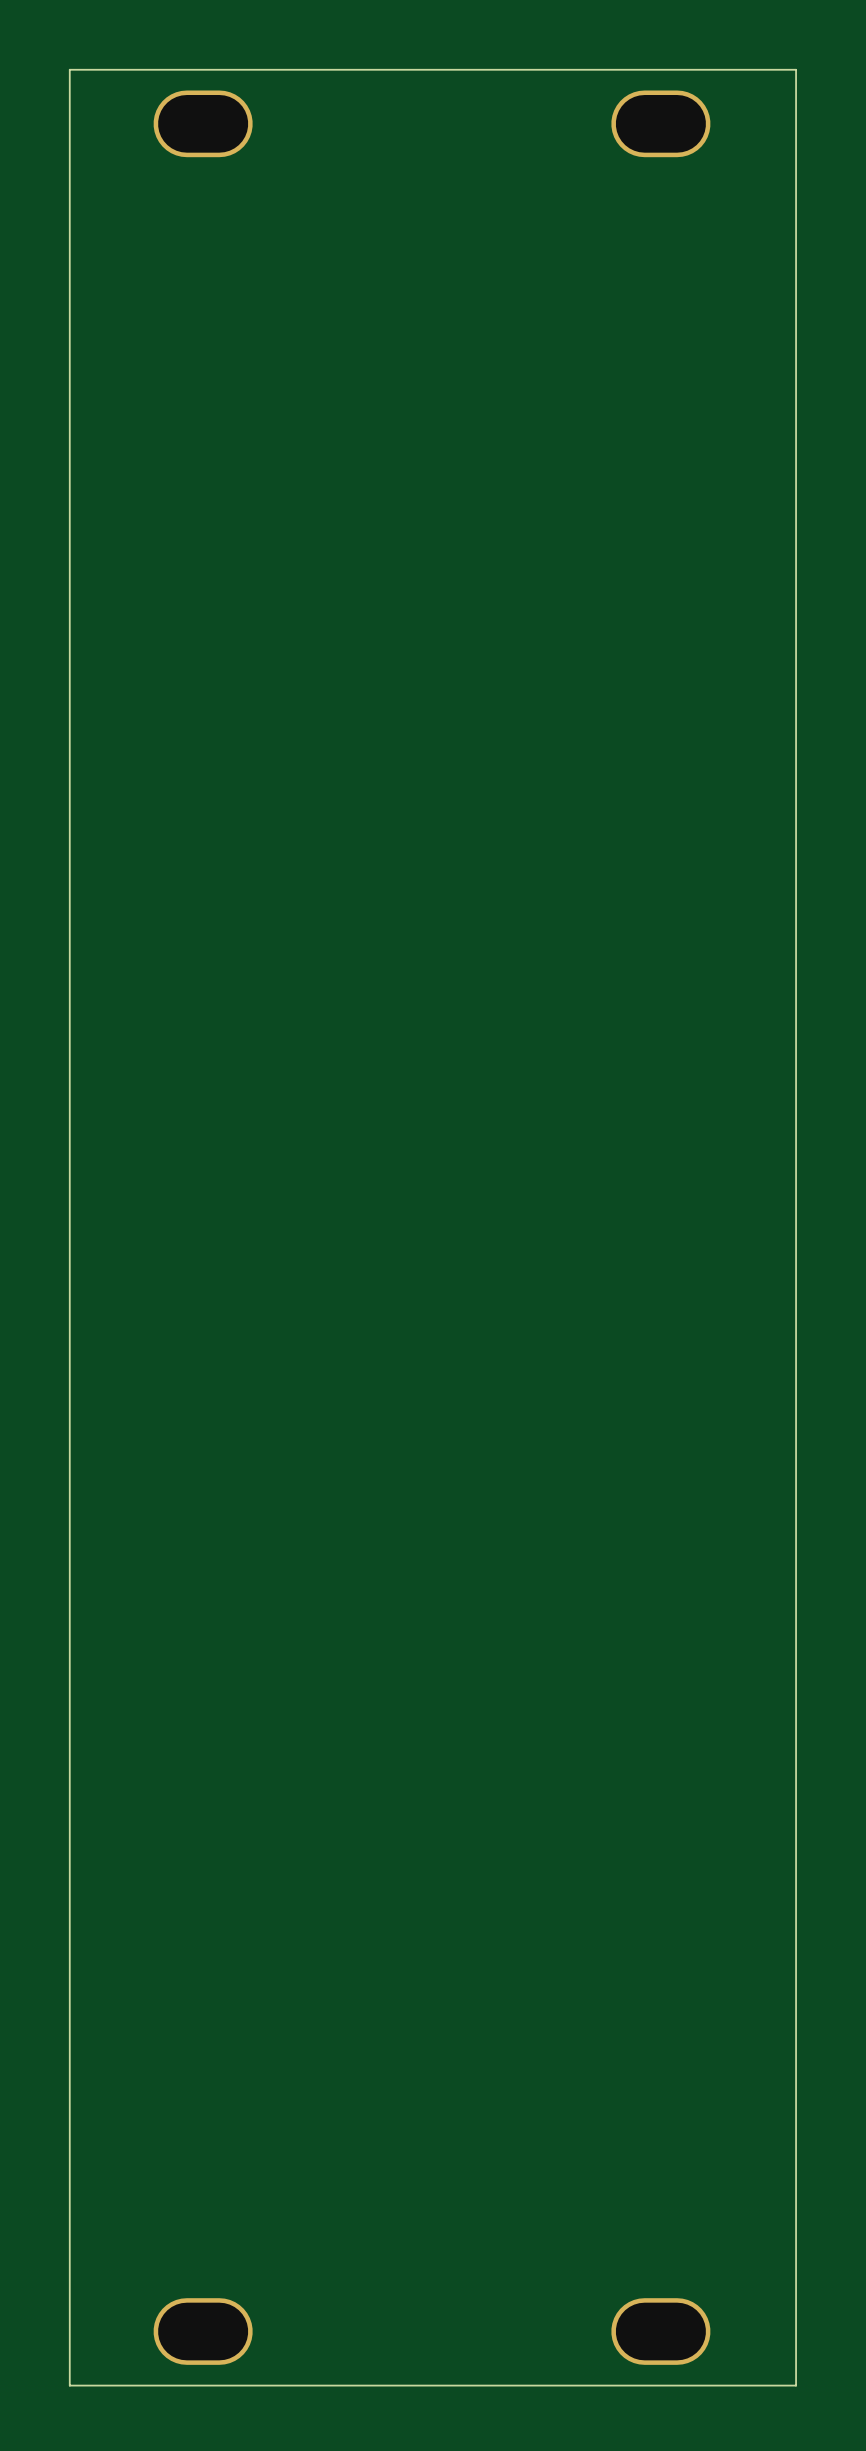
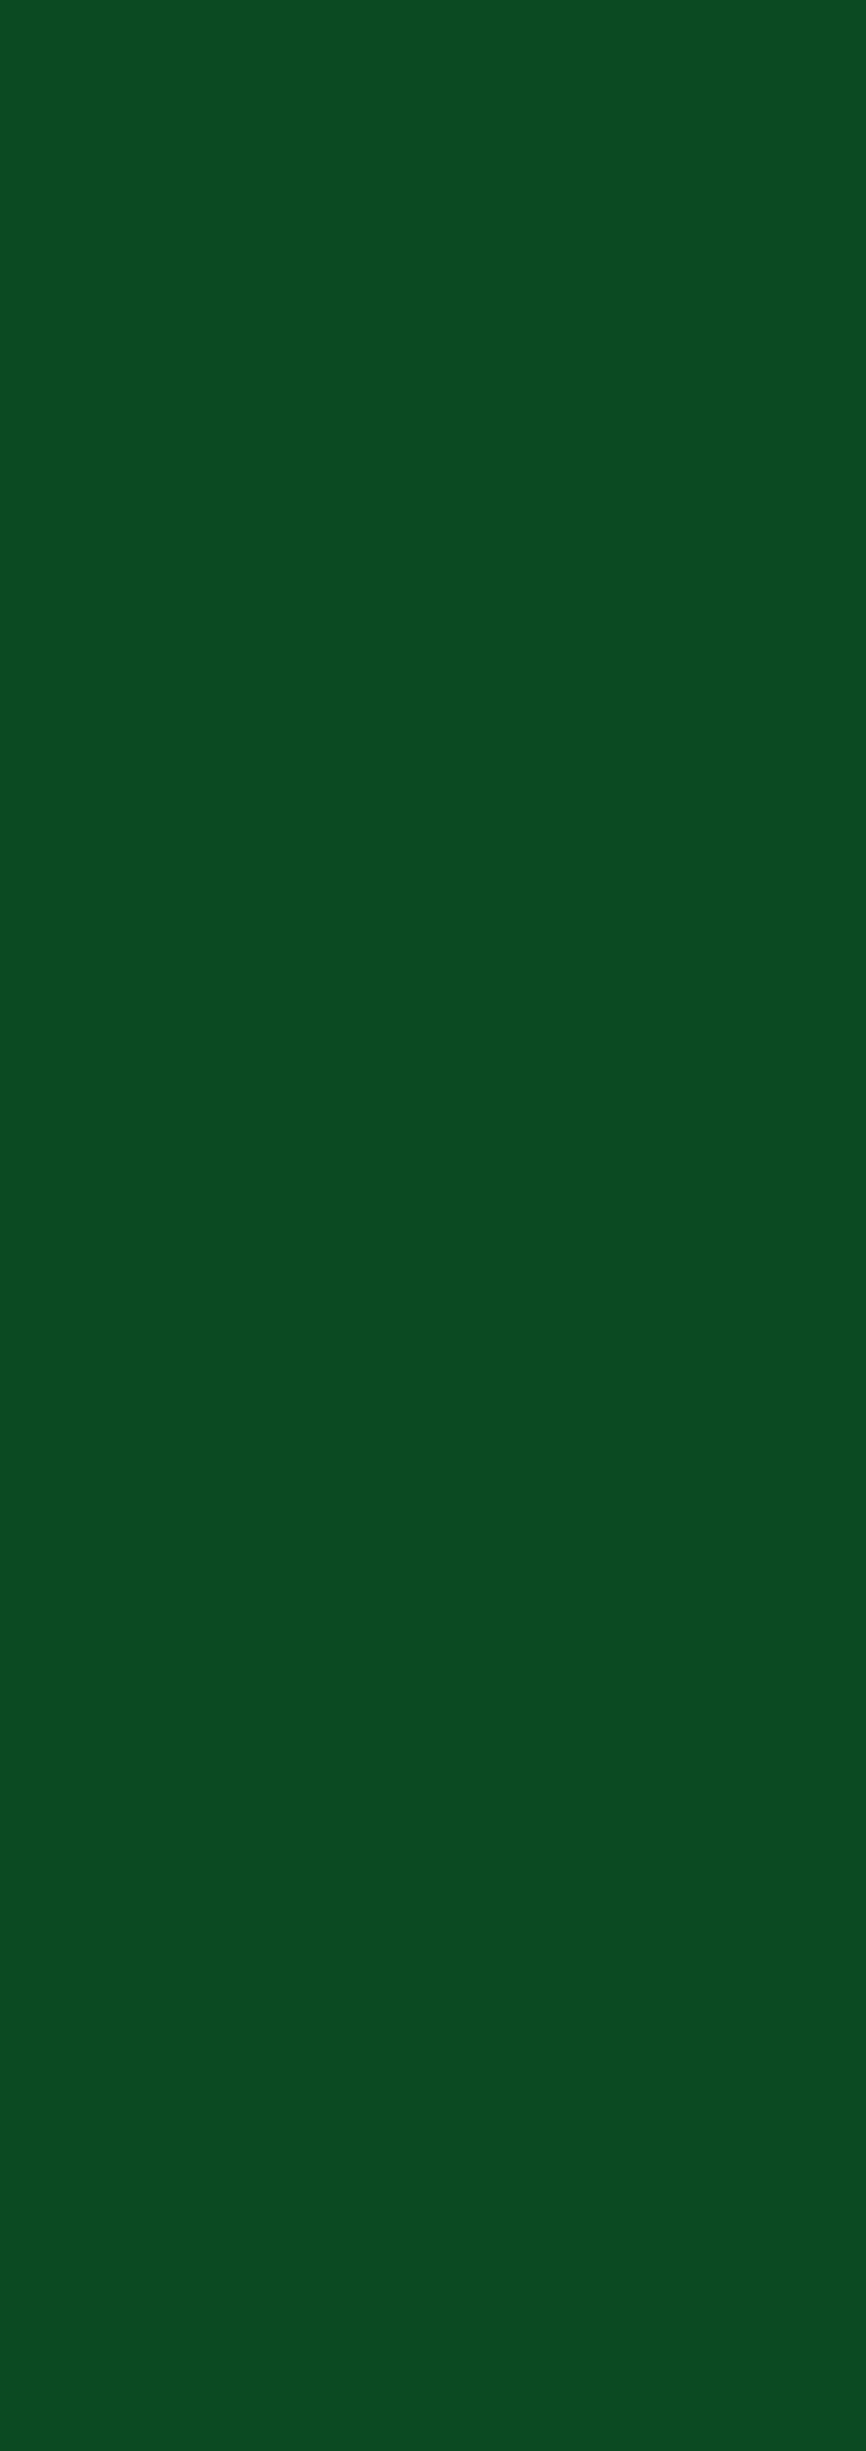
board edge: (796, 69) (69, 69) (69, 2385) (796, 2385) (796, 69) -> none
part: (203, 123) -> none
part: (660, 123) -> none
part: (203, 2331) -> none
part: (660, 2331) -> none

